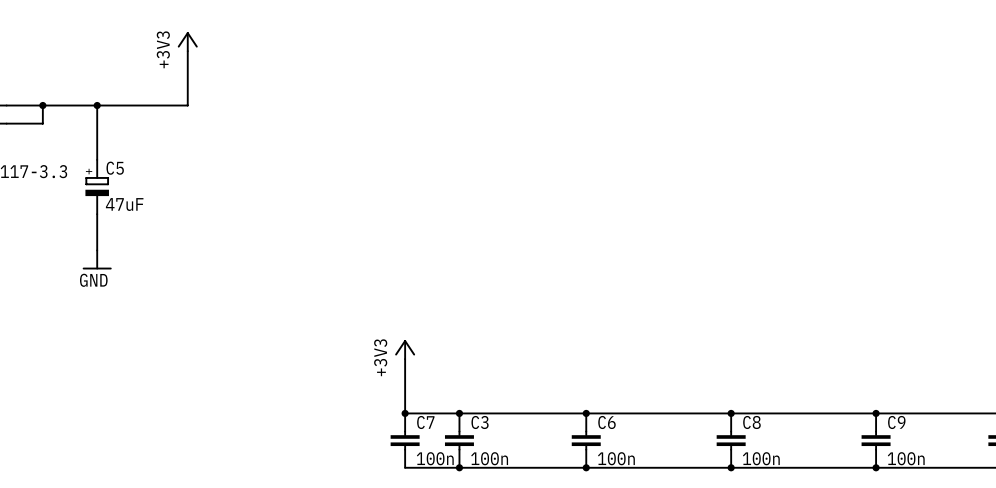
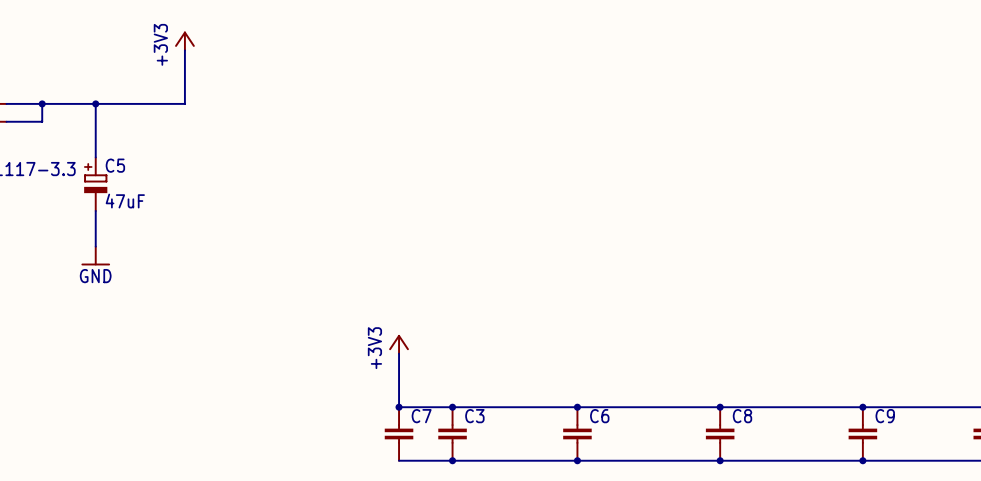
C7 value: 100n (435, 458) -> none
C3 value: 100n (489, 458) -> none
C6 value: 100n (616, 458) -> none
C8 value: 100n (761, 458) -> none
C9 value: 100n (906, 458) -> none

